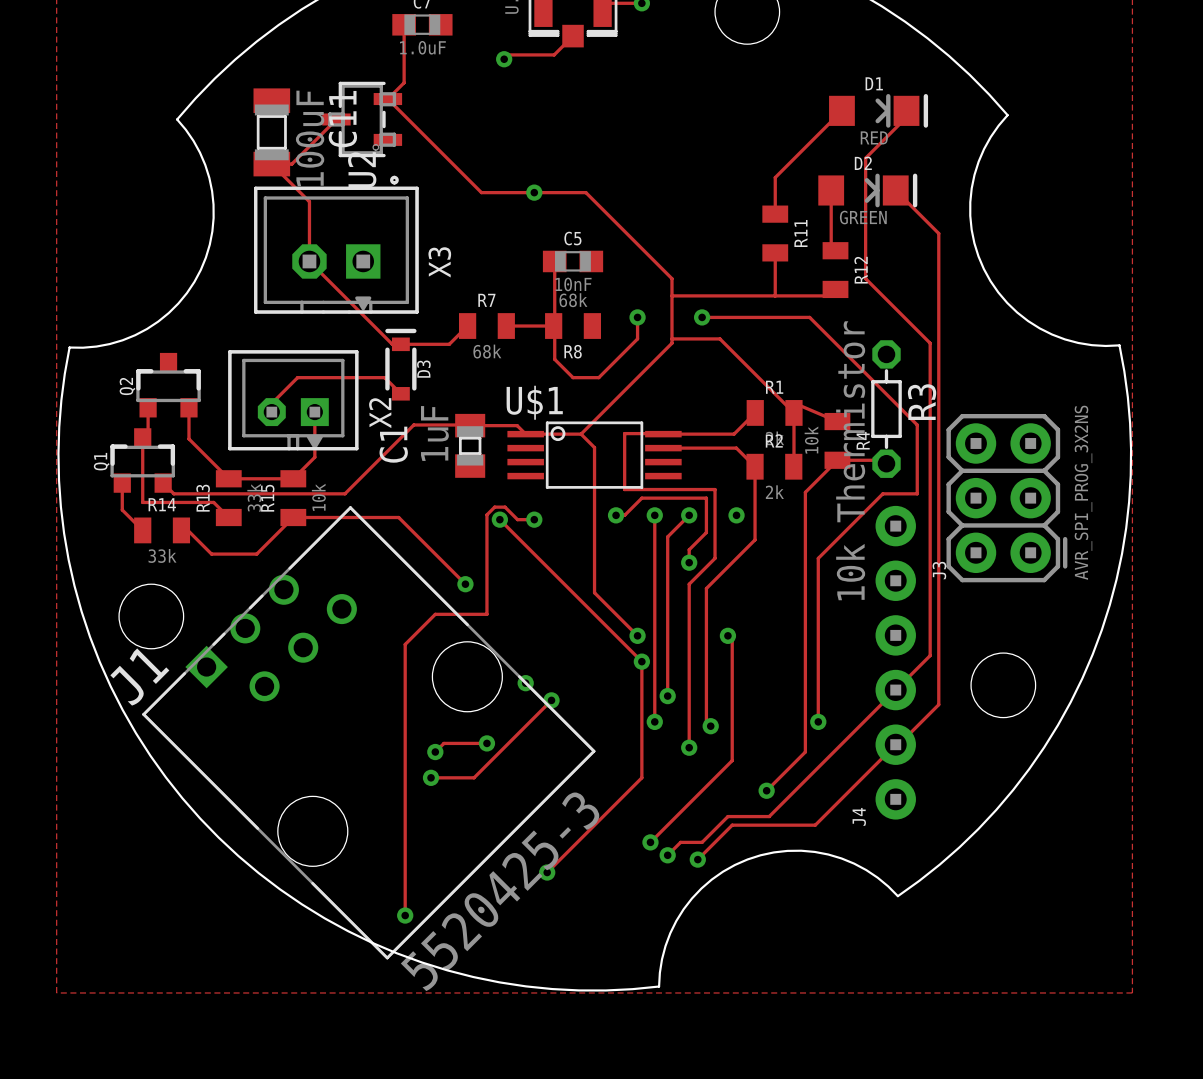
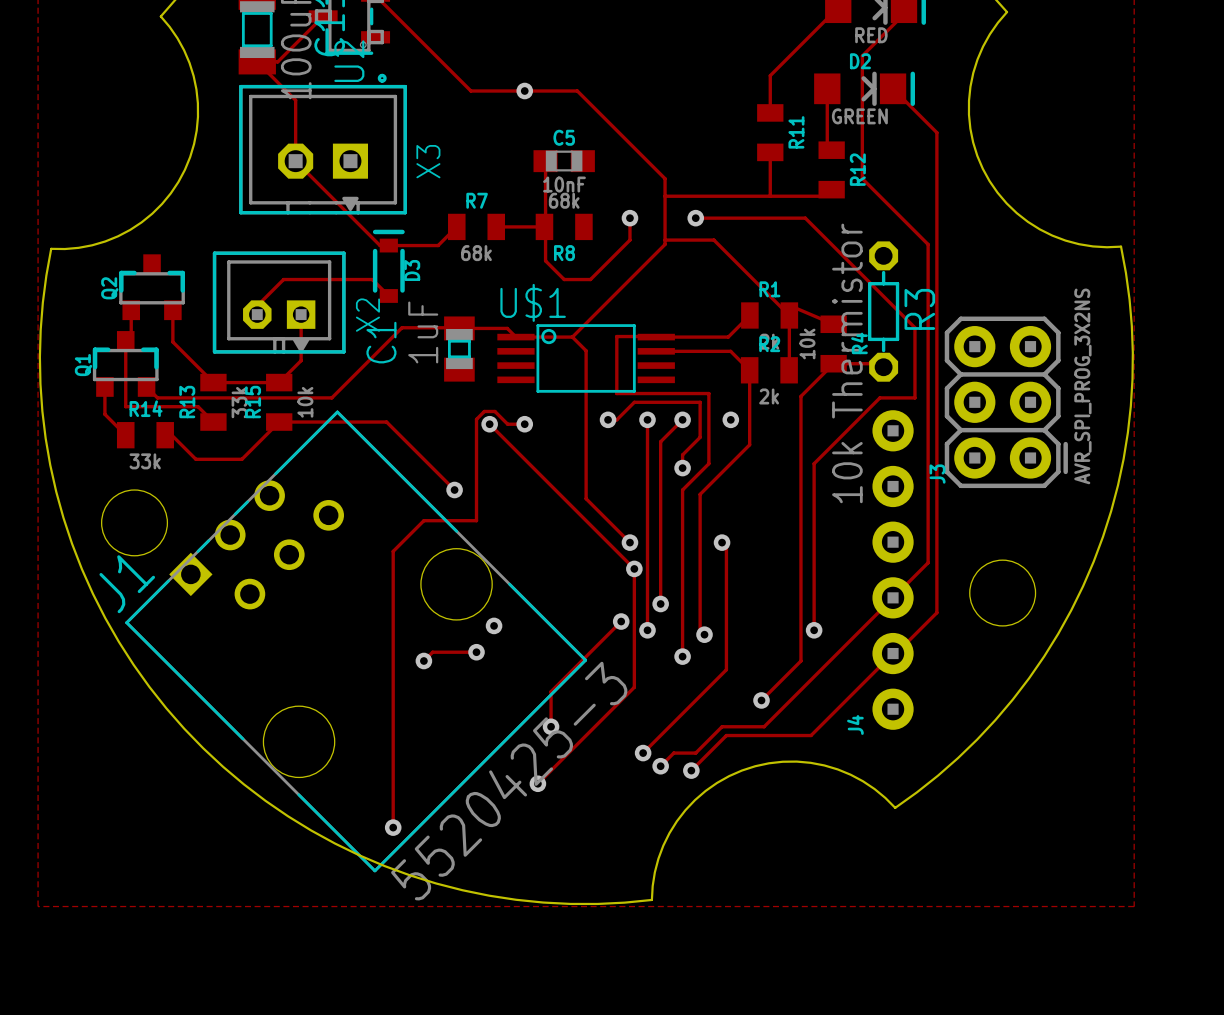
via: (525, 683) -> none
track: (551, 700) (474, 777) (431, 777) -> none
via: (551, 700) -> none
track: none -> (621, 621) (551, 691) (551, 726)
via: none -> (621, 621)
via: none -> (494, 625)
via: (431, 777) -> none
via: none -> (551, 726)

